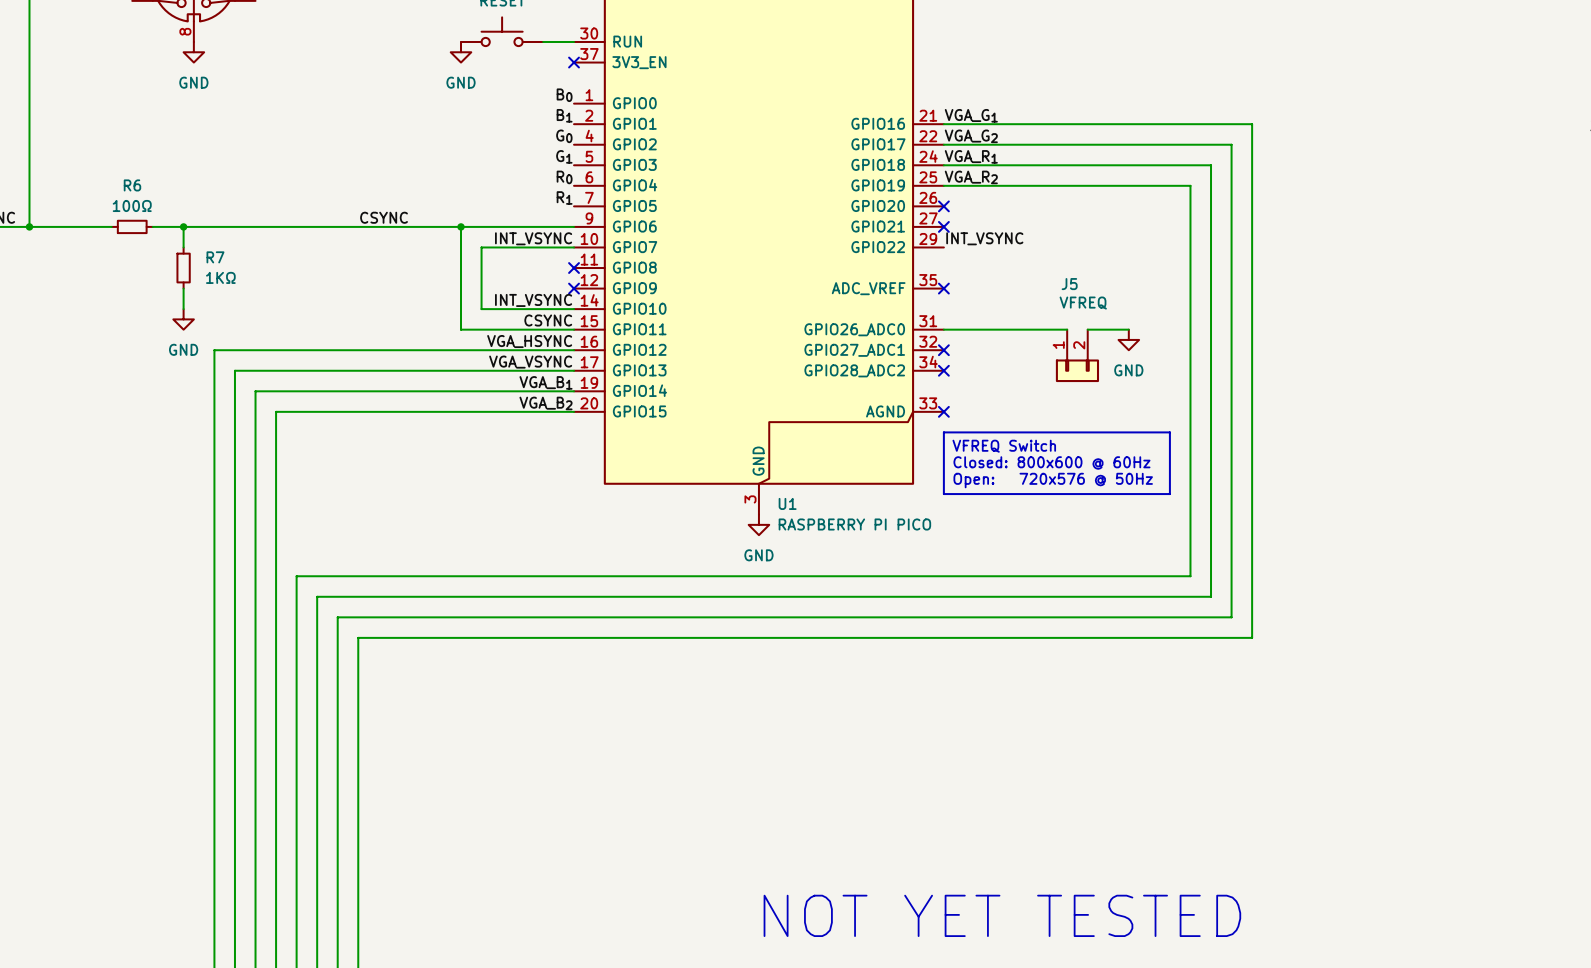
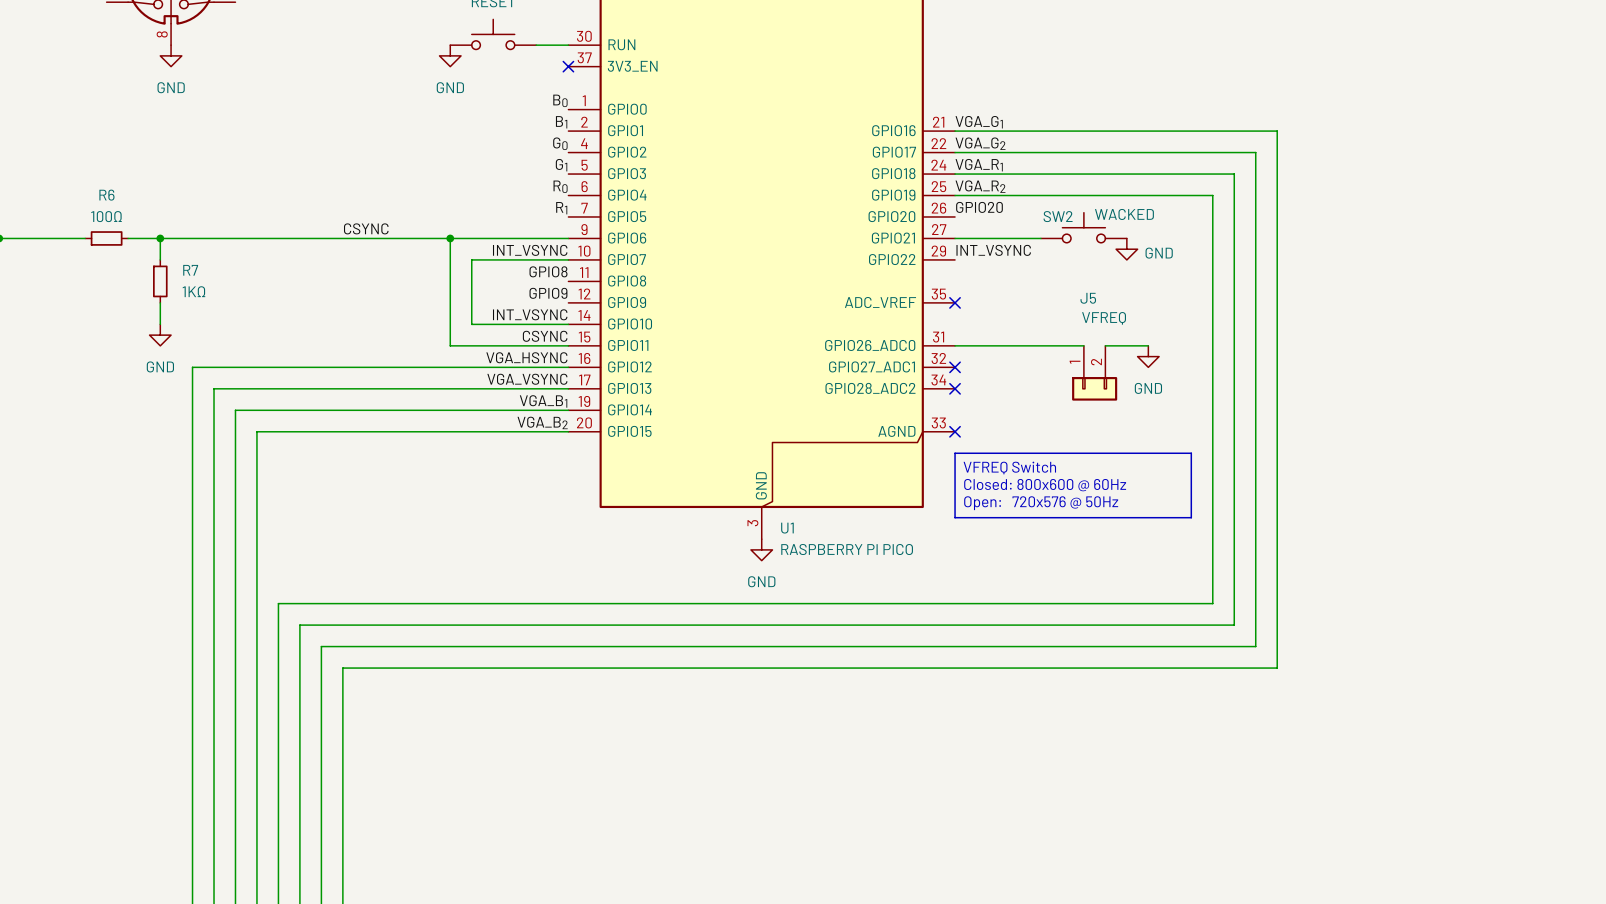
label: none -> GPIO20 (979, 207)
no-connect mark: (943, 206) -> none
SW2: none -> WACKED (1083, 227)
wire: none -> (955, 238) (1040, 238)
no-connect mark: (943, 226) -> none
power symbol: none -> GND (1126, 249)
label: none -> GPIO8 (548, 271)
no-connect mark: (574, 268) -> none
label: none -> GPIO9 (548, 293)
no-connect mark: (574, 288) -> none

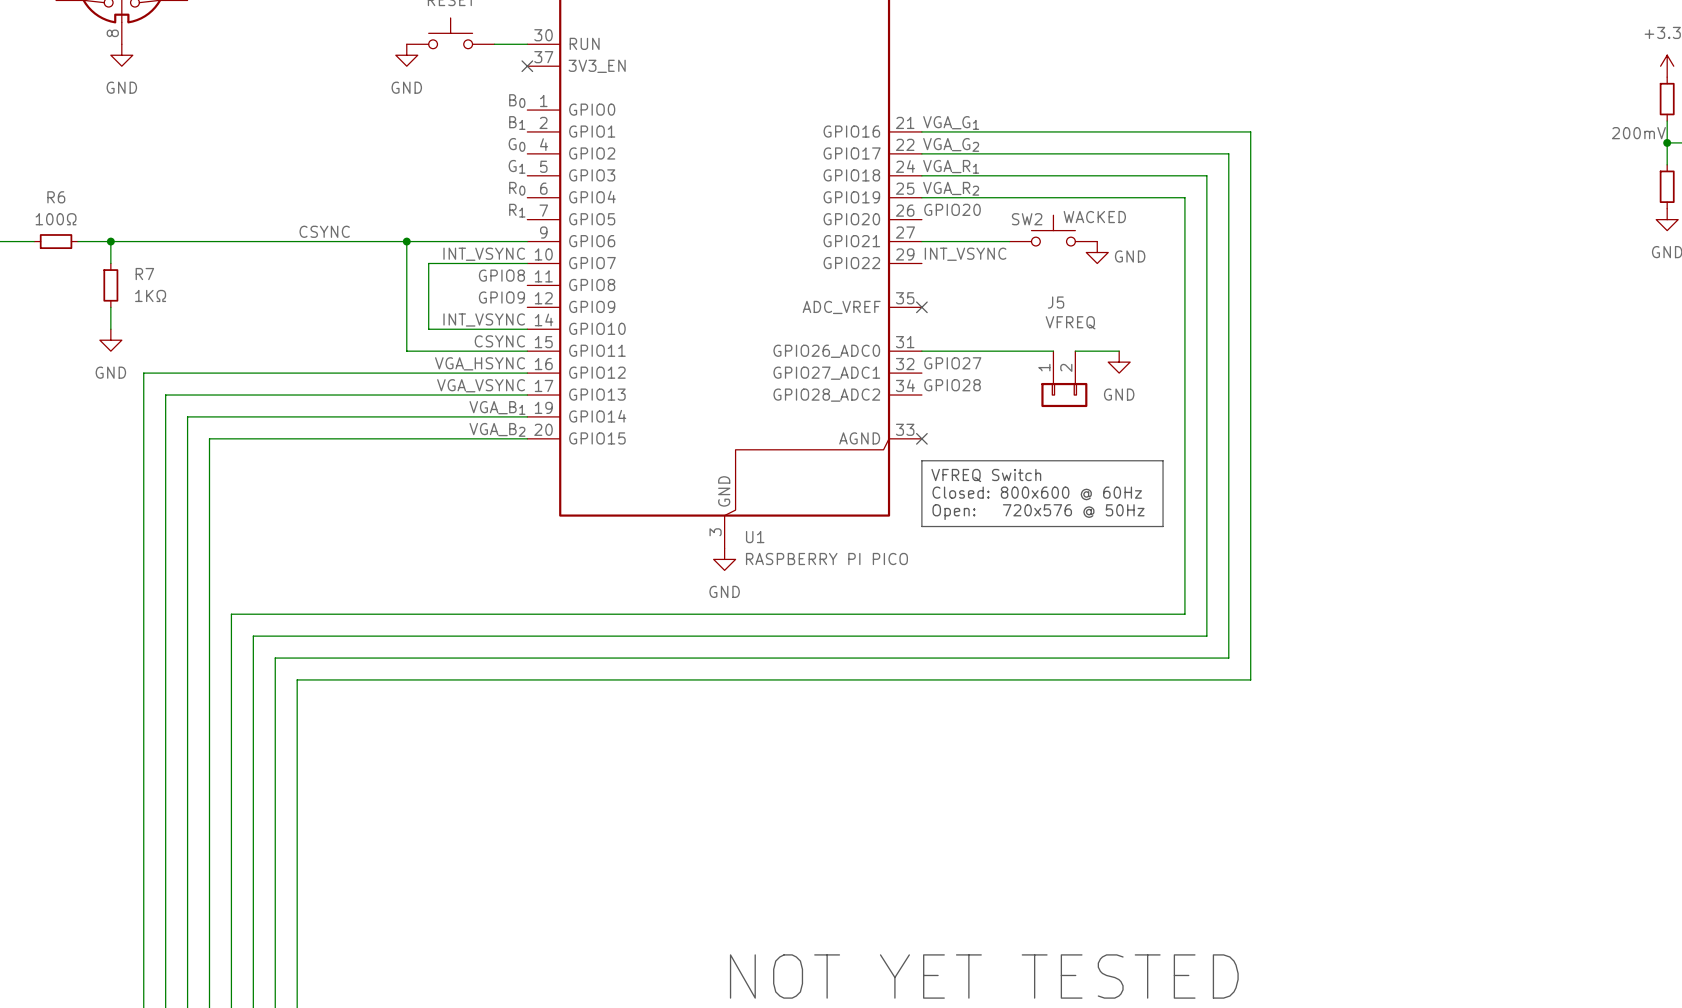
label: none -> GPIO27 (952, 363)
no-connect mark: (955, 367) -> none
label: none -> GPIO28 (952, 385)
no-connect mark: (955, 388) -> none

